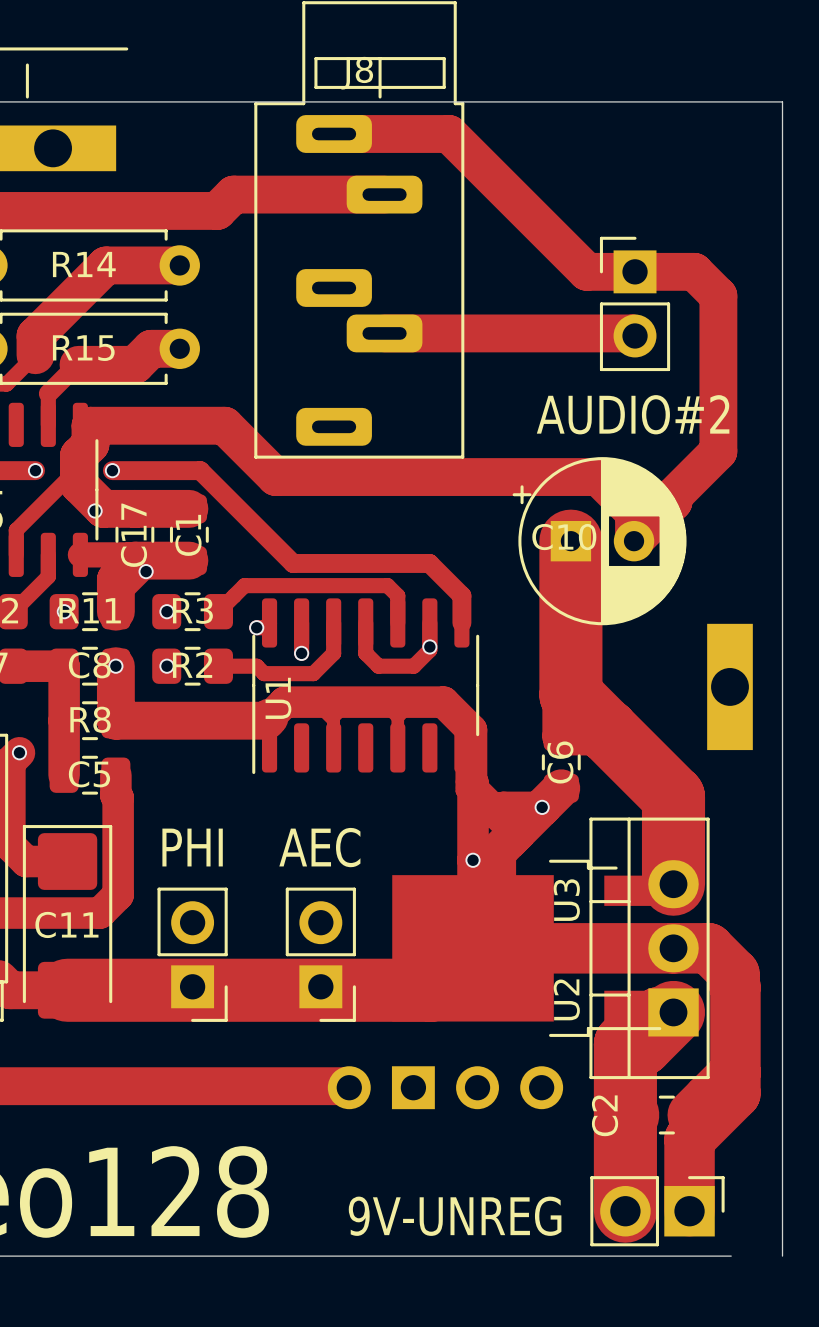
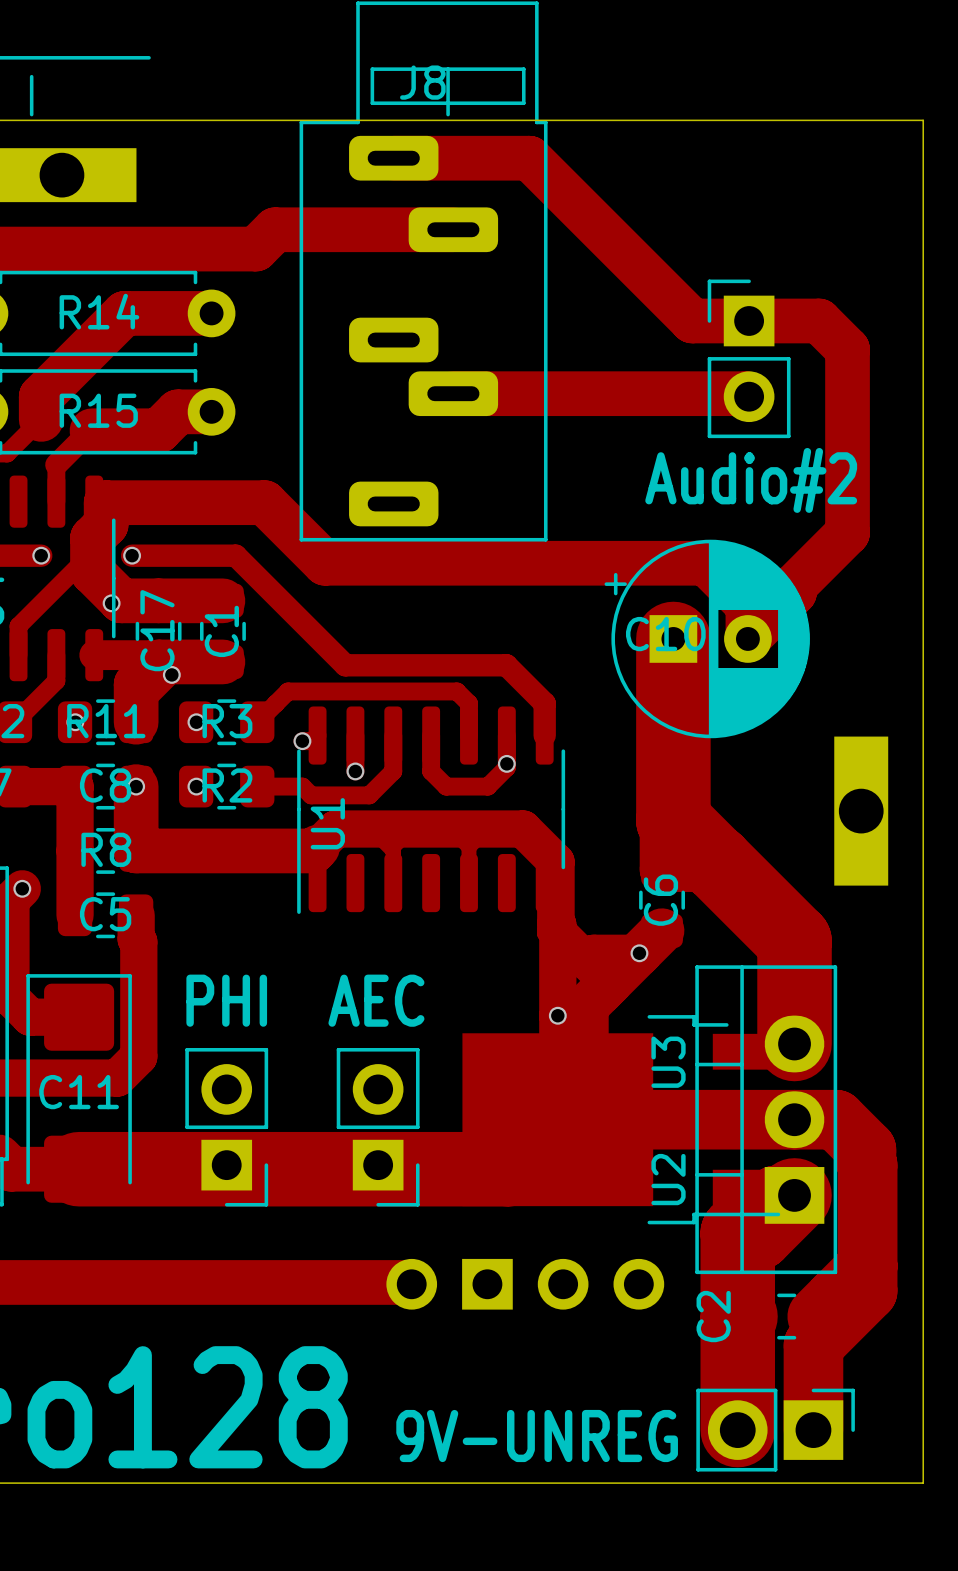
AUDIO#2 name: AUDIO#2 (633, 414) -> Audio#2 (751, 480)
board edge: none -> (862, 1483) (923, 1483)

